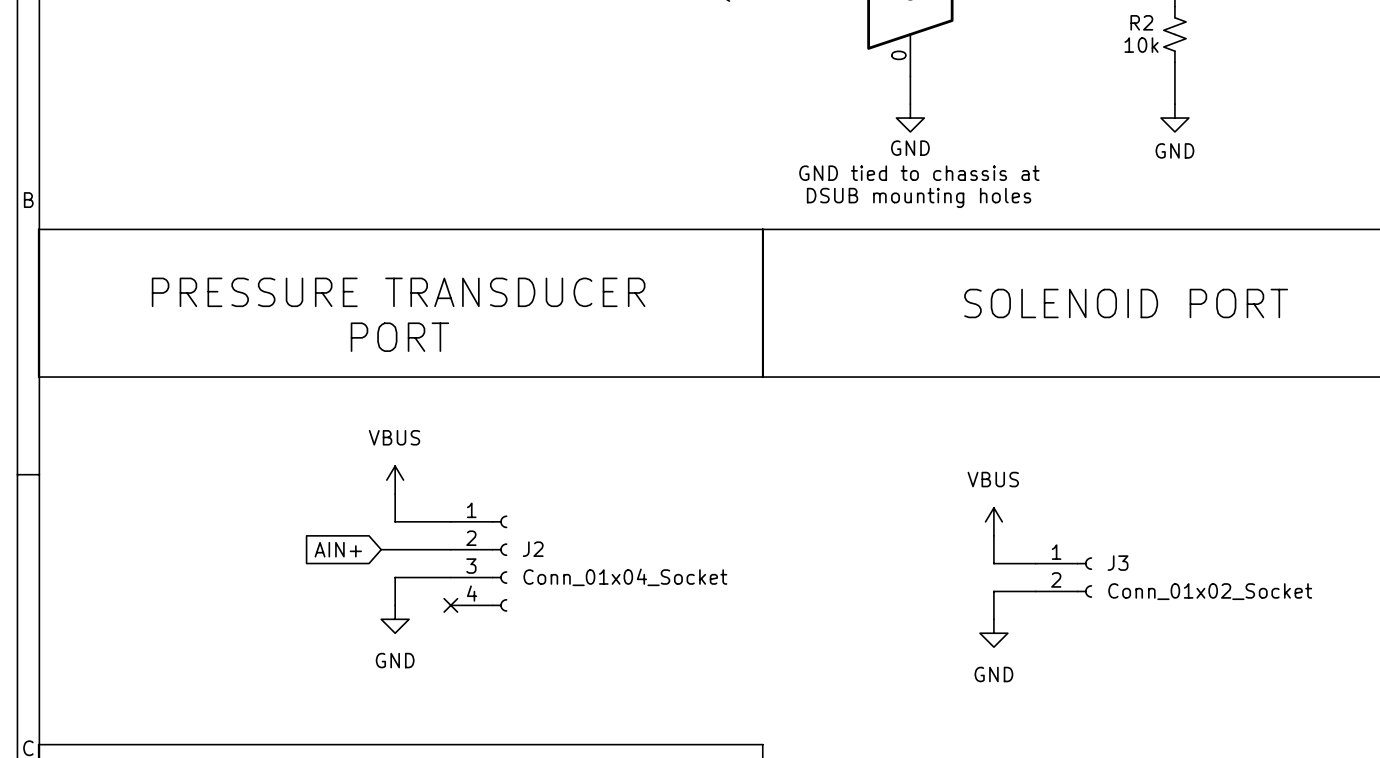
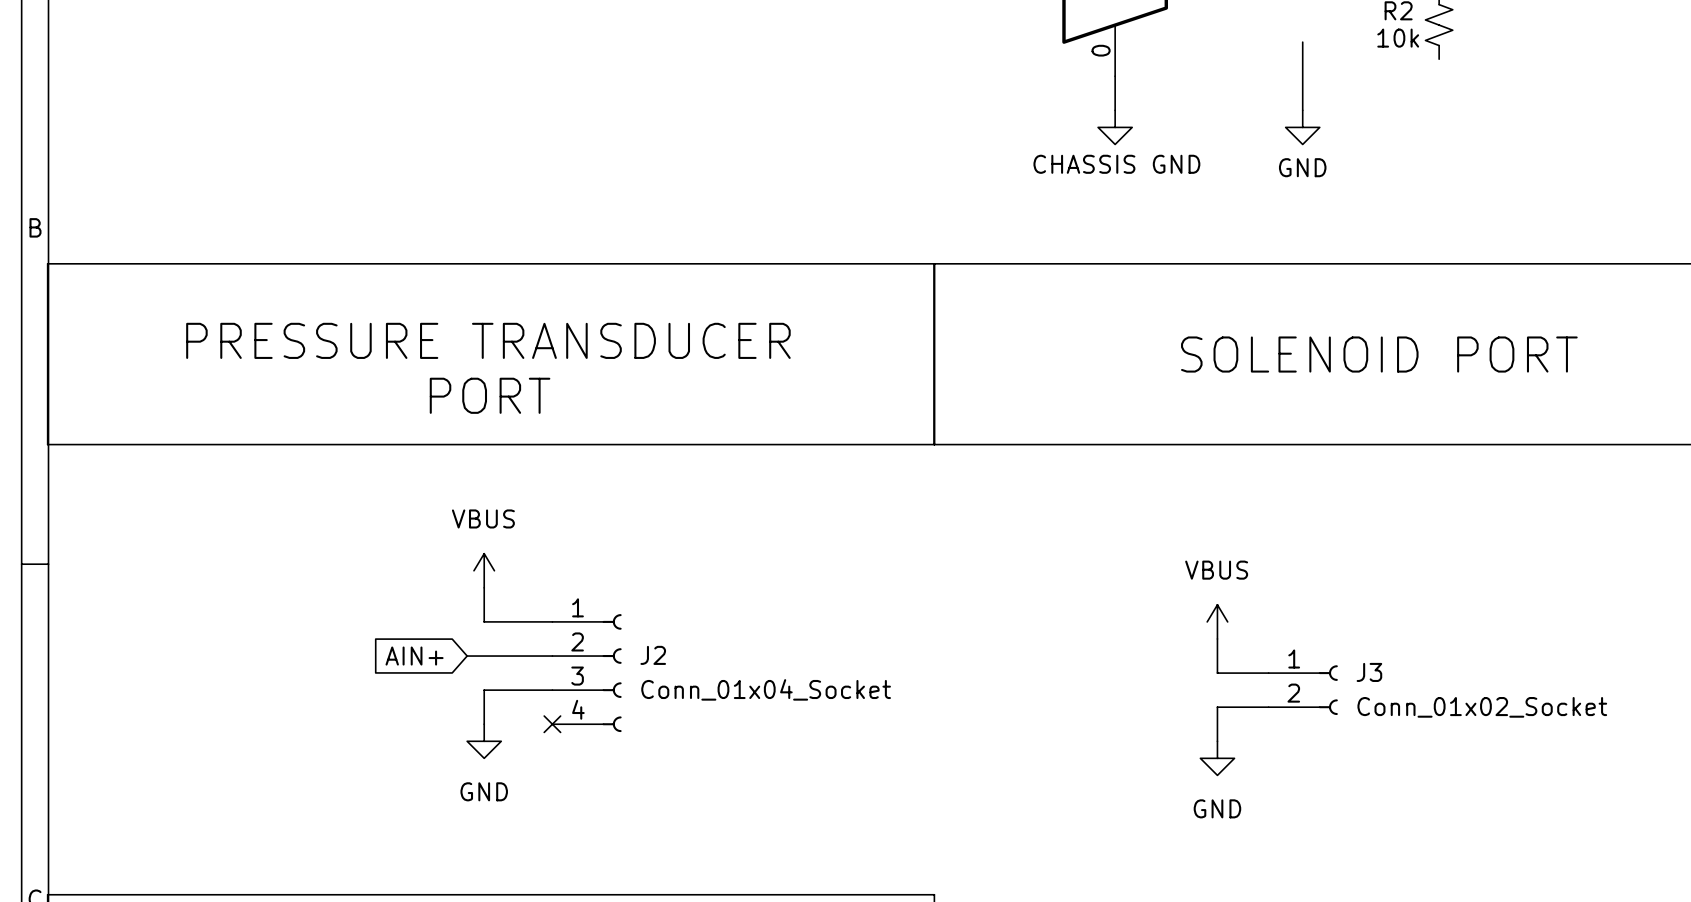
wire: none -> (1302, 42) (1302, 110)
wire: (1174, 62) (1174, 104) -> none
power symbol: GND (910, 118) -> CHASSIS GND (1115, 127)
power symbol position: GND (1174, 118) -> GND (1302, 127)
text: GND tied to chassis at (919, 173) -> none
text: DSUB mounting holes (919, 197) -> none

